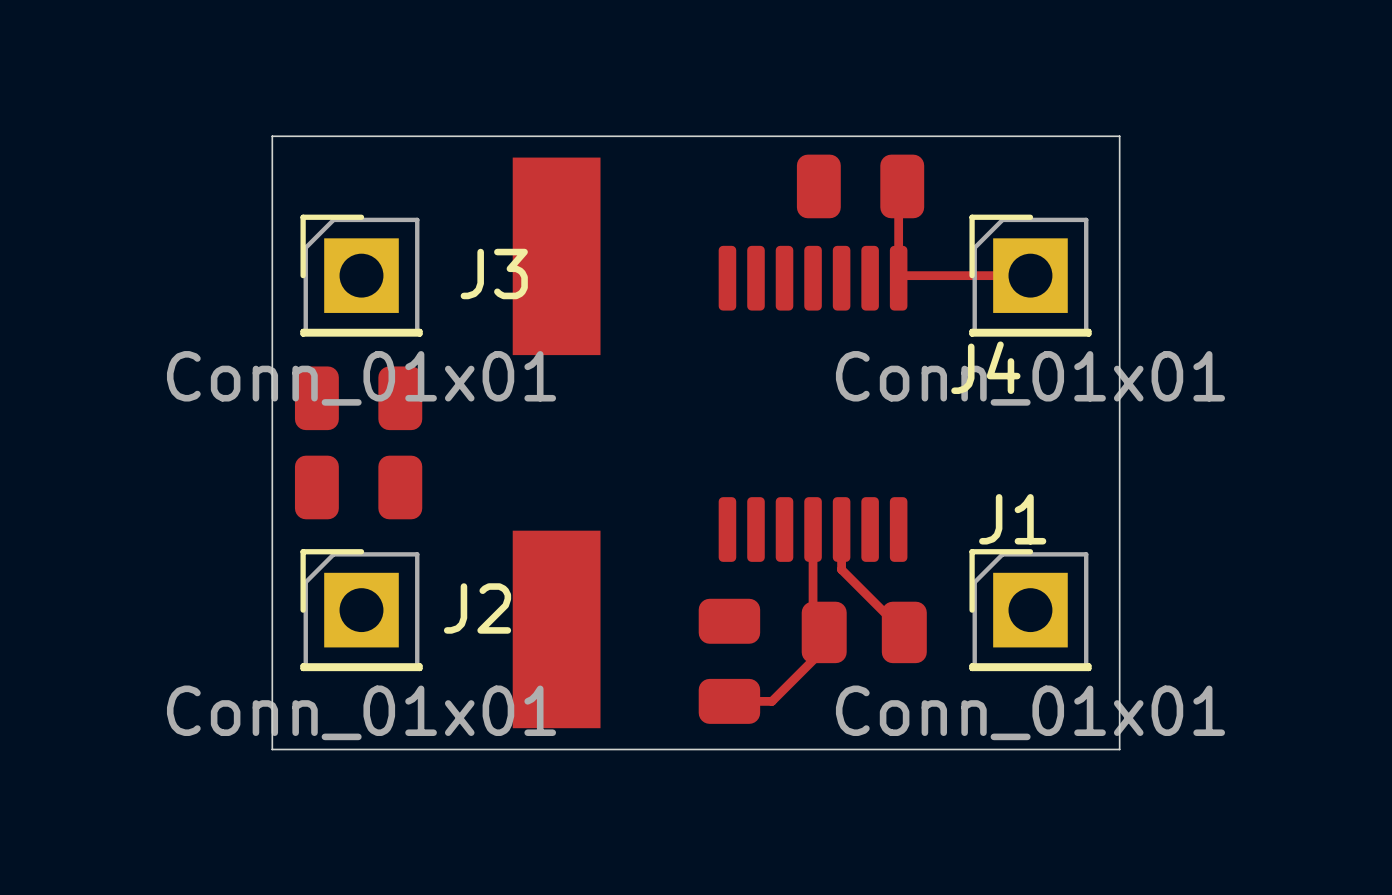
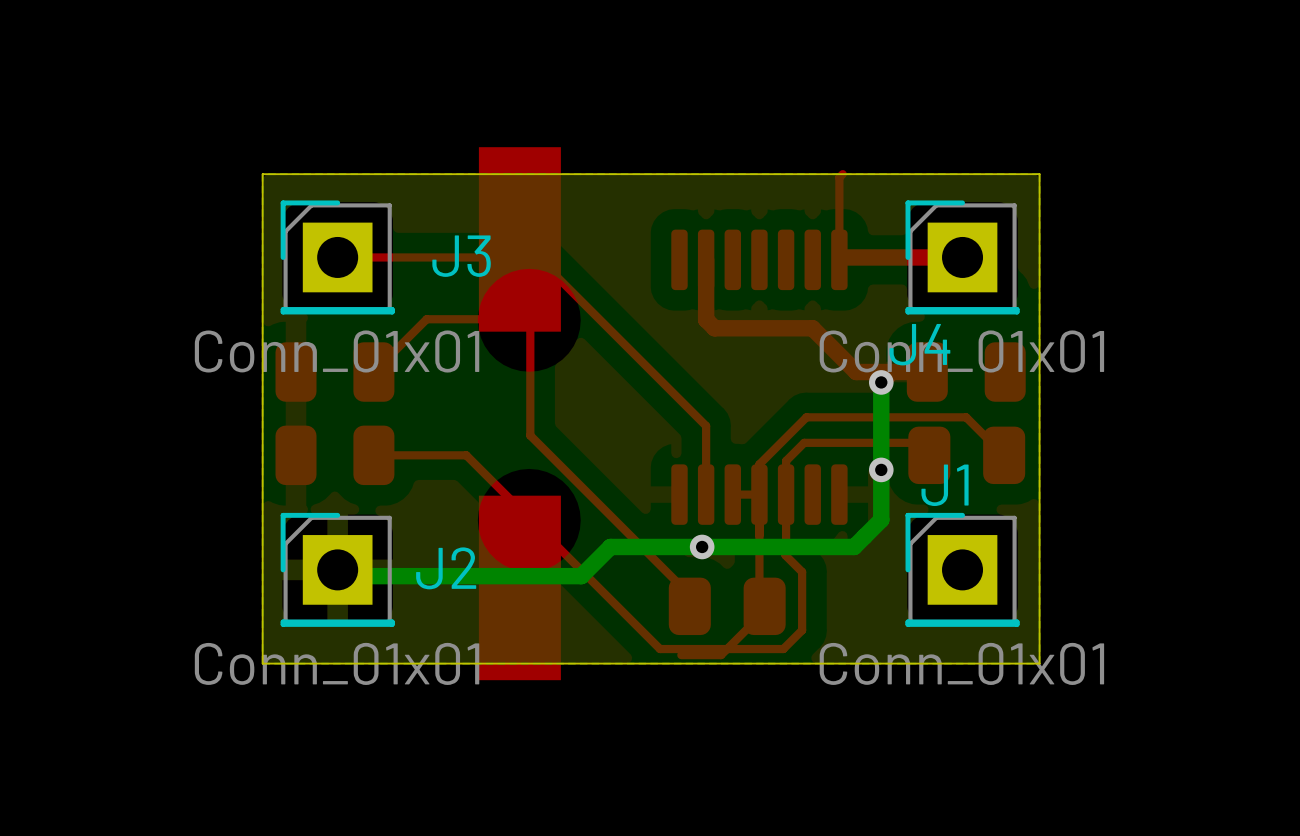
board edge: (1119, 136) (272, 136) (272, 749) (1119, 749) (1119, 136) -> (1039, 174) (1039, 663) (262, 663) (262, 174) (1039, 174)
part position: (860, 186) -> (966, 372)
top track: none -> (337, 257) (537, 257) (706, 425) (706, 494)
top track width: thin (1030, 275) (901, 275) -> thick (962, 257) (841, 257)
top track: none -> (706, 259) (706, 319) (714, 328) (812, 328) (856, 372) (927, 372)
top track: none -> (373, 372) (426, 319) (530, 319) (530, 435) (689, 595) (689, 606)
bottom track: none -> (881, 382) (881, 519) (854, 546) (610, 546) (581, 576) (343, 576) (337, 569)
via: none -> (881, 382)
top track: none -> (929, 455) (916, 442) (804, 442) (786, 460) (786, 494)
part: none -> (966, 455)
top track: none -> (1004, 455) (966, 417) (806, 417) (759, 464) (759, 494) (732, 494)
via: none -> (881, 469)
top track: (841, 569) (904, 632) -> (786, 532) (785, 555) (802, 571) (802, 630) (783, 649) (660, 649) (466, 455) (373, 455)
via: none -> (702, 546)
part: (864, 632) -> none
part: none -> (727, 606)
part: (729, 661) -> none

